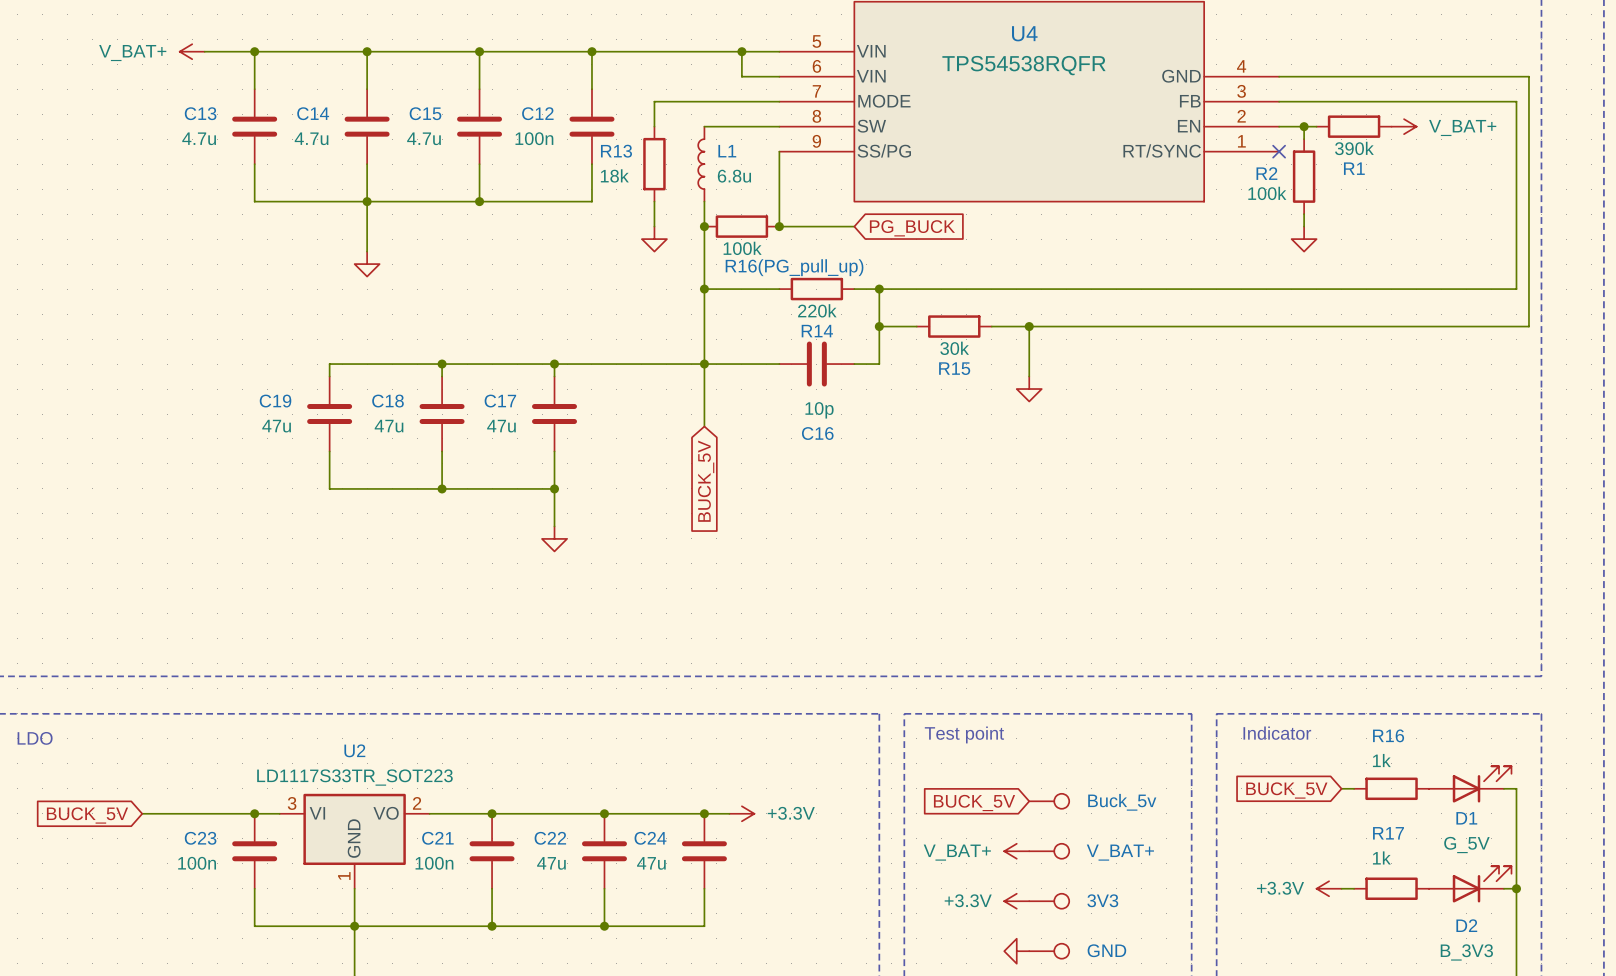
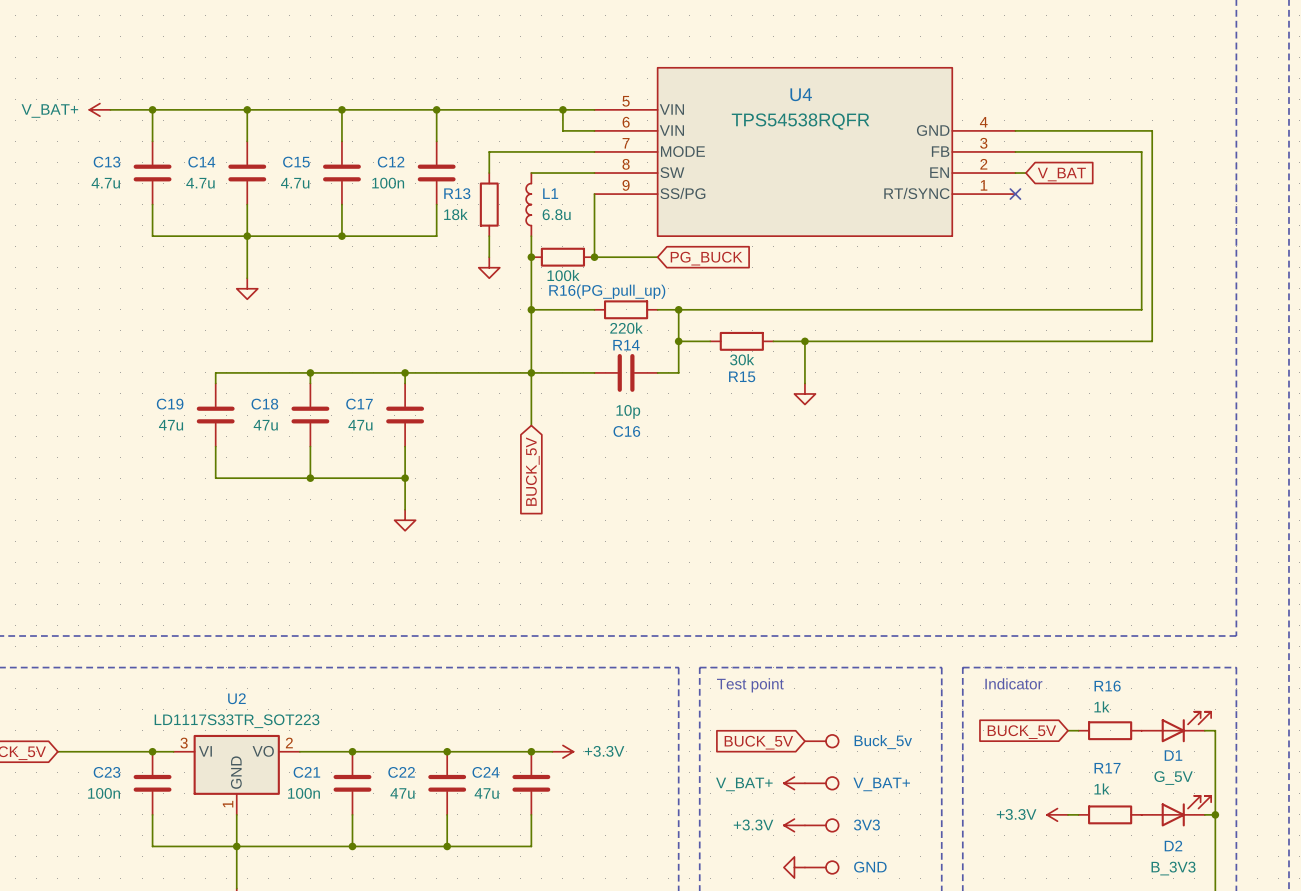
wire: (1441, 76) (1528, 76) (1528, 326) (1441, 326) -> (1152, 130) (1152, 341)
wire: (1429, 101) (1516, 101) (1516, 289) (1429, 289) -> (1141, 151) (1141, 309)
wire: (1291, 126) (1316, 126) -> none
wire: (1304, 126) (1304, 139) -> none
junction: (1304, 126) -> none
R1: 390k (1354, 126) -> none
power symbol: V_BAT+ (1404, 126) -> none
global label: none -> V_BAT (1061, 174)
R2: 100k (1304, 176) -> none
wire: (1304, 214) (1304, 226) -> none
power symbol: (1304, 239) -> none

